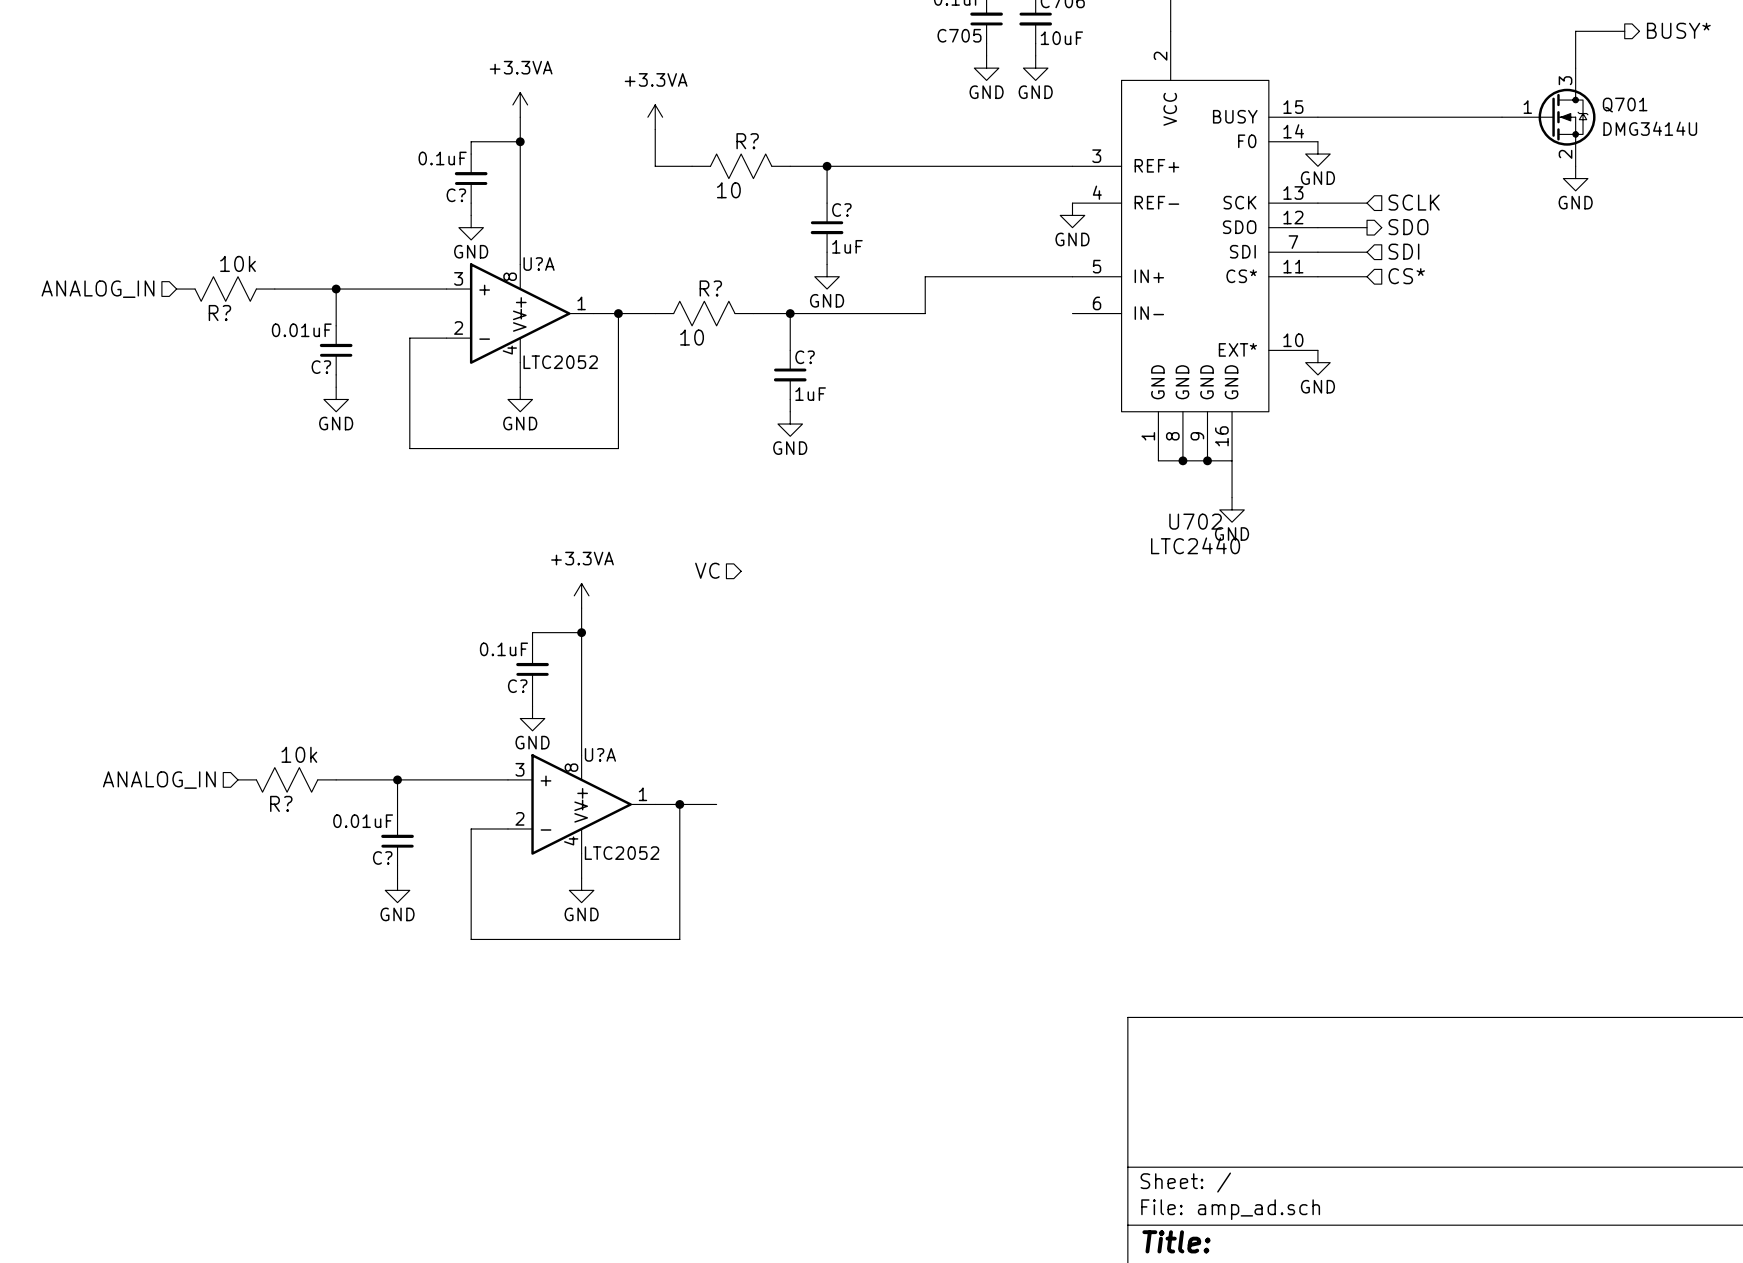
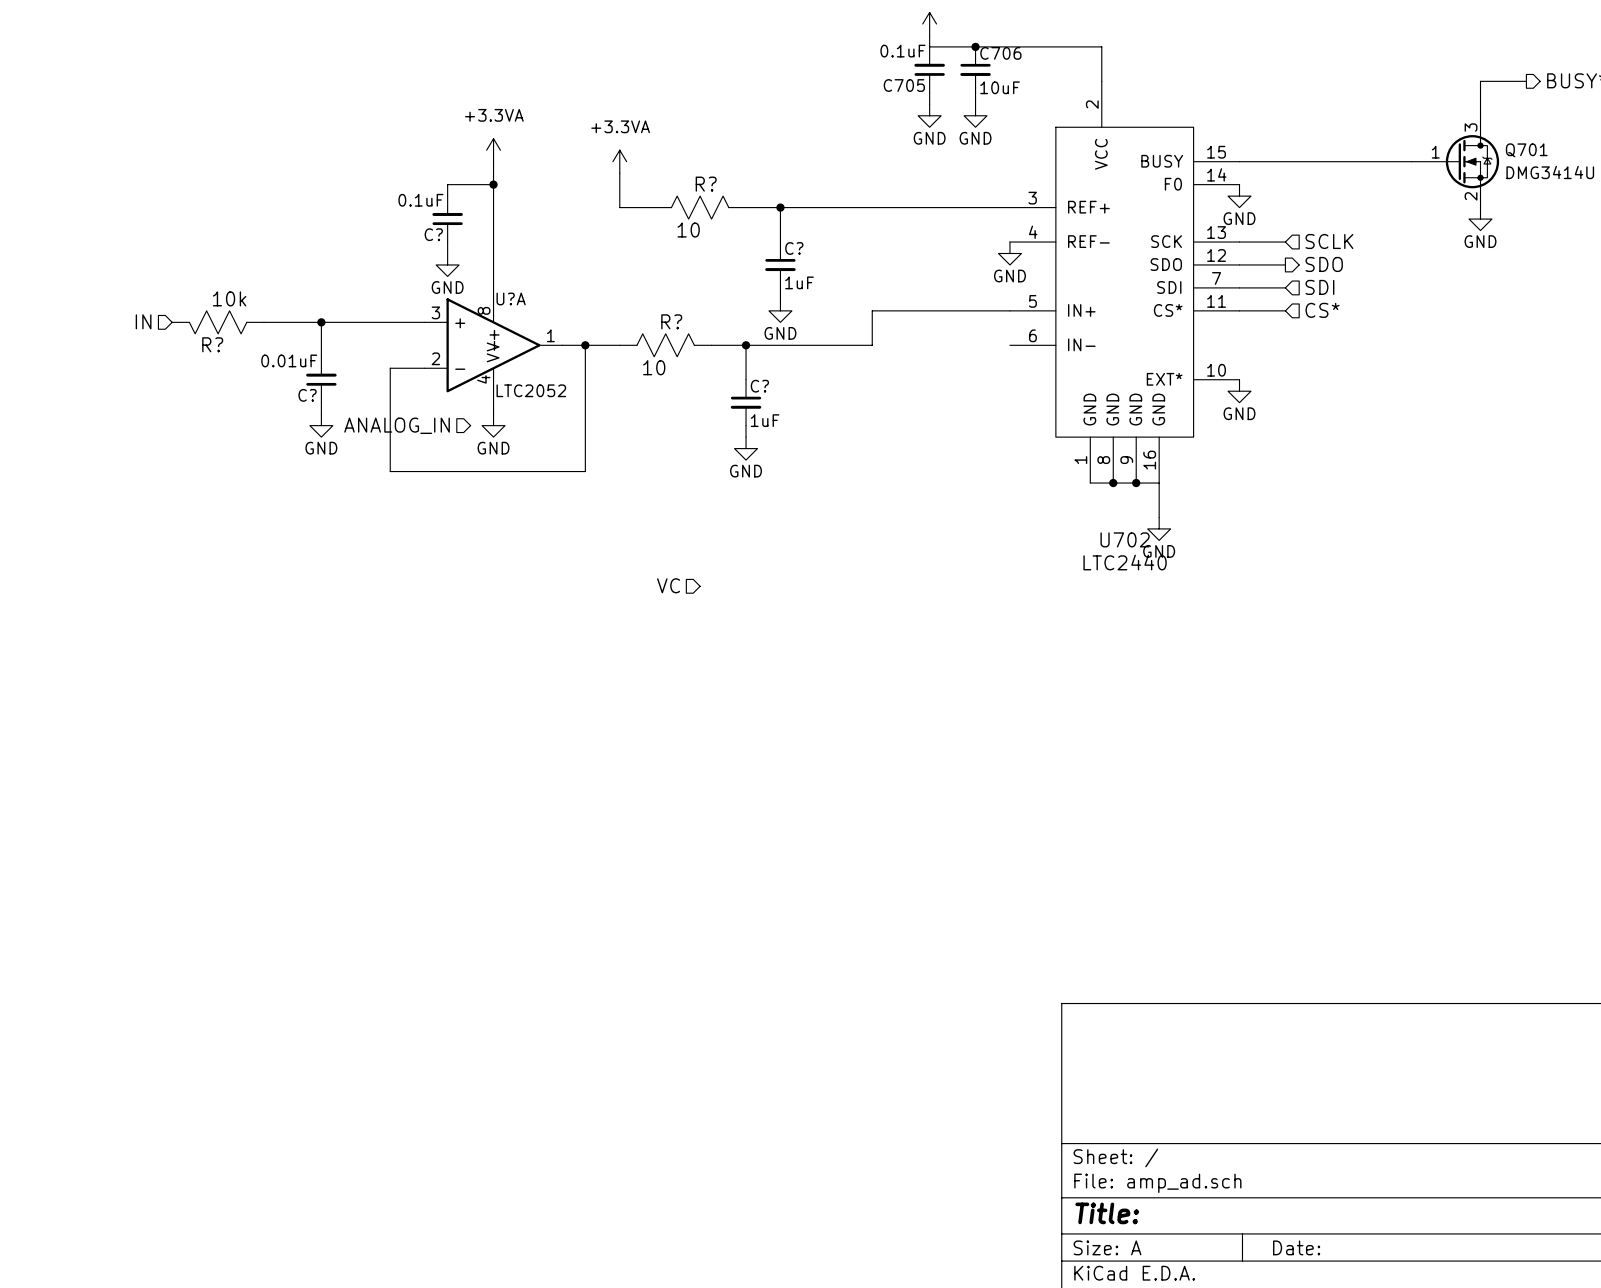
hierarchical label: ANALOG_IN (98, 289) -> IN (143, 321)
hierarchical label: none -> ANALOG_IN (397, 425)
power symbol: +3.3VA (581, 595) -> none
wire: (581, 608) (581, 755) -> none
wire: (581, 632) (532, 632) (532, 644) -> none
junction: (581, 632) -> none
C?: 0.1uF (532, 669) -> none
wire: (532, 694) (532, 706) -> none
power symbol: GND (532, 718) -> none
R?: 10k (287, 779) -> none
wire: (336, 779) (507, 779) -> none
wire: (397, 779) (397, 816) -> none
junction: (397, 779) -> none
hierarchical label: ANALOG_IN (159, 780) -> none
U?A: LTC2052 (581, 804) -> none
wire: (655, 804) (716, 804) -> none
wire: (679, 804) (679, 939) (471, 939) (471, 828) (507, 828) -> none
junction: (679, 804) -> none
C?: 0.01uF (397, 841) -> none
wire: (581, 853) (581, 878) -> none
wire: (397, 865) (397, 878) -> none
power symbol: GND (397, 890) -> none
power symbol: GND (581, 890) -> none

